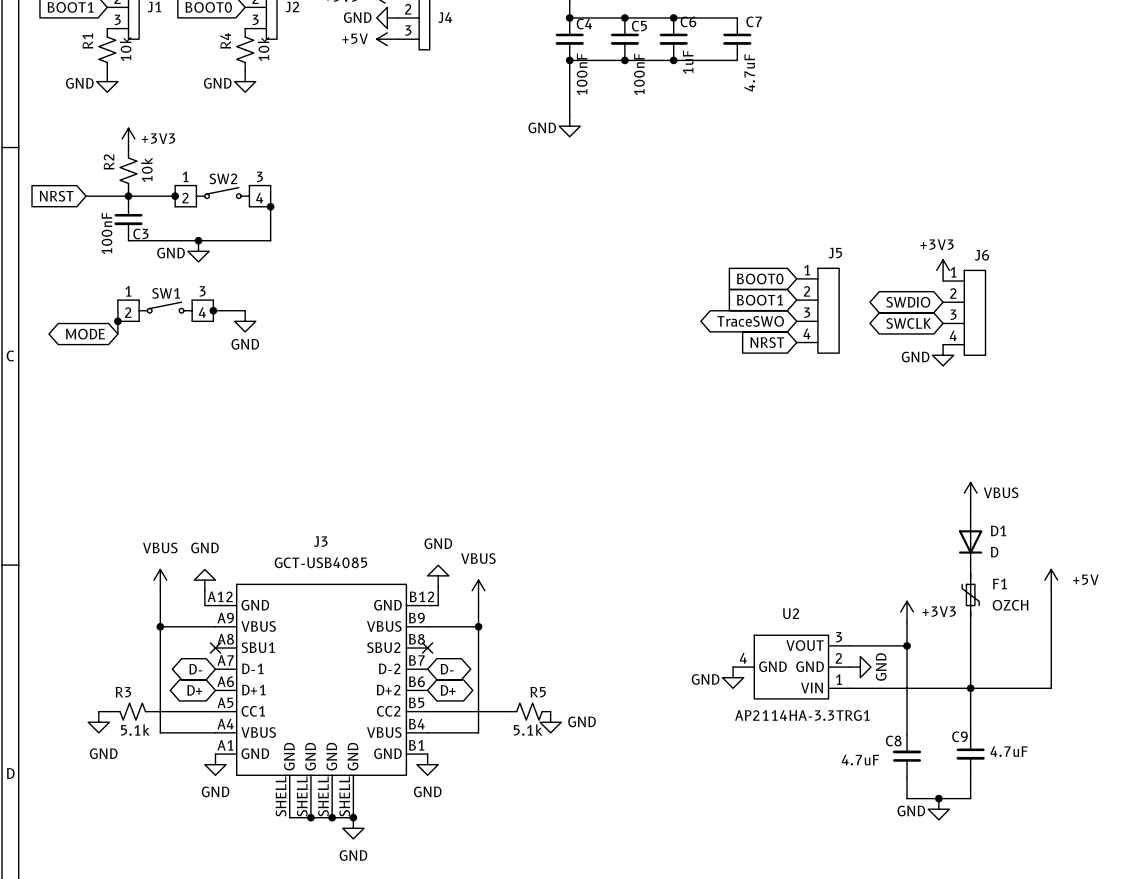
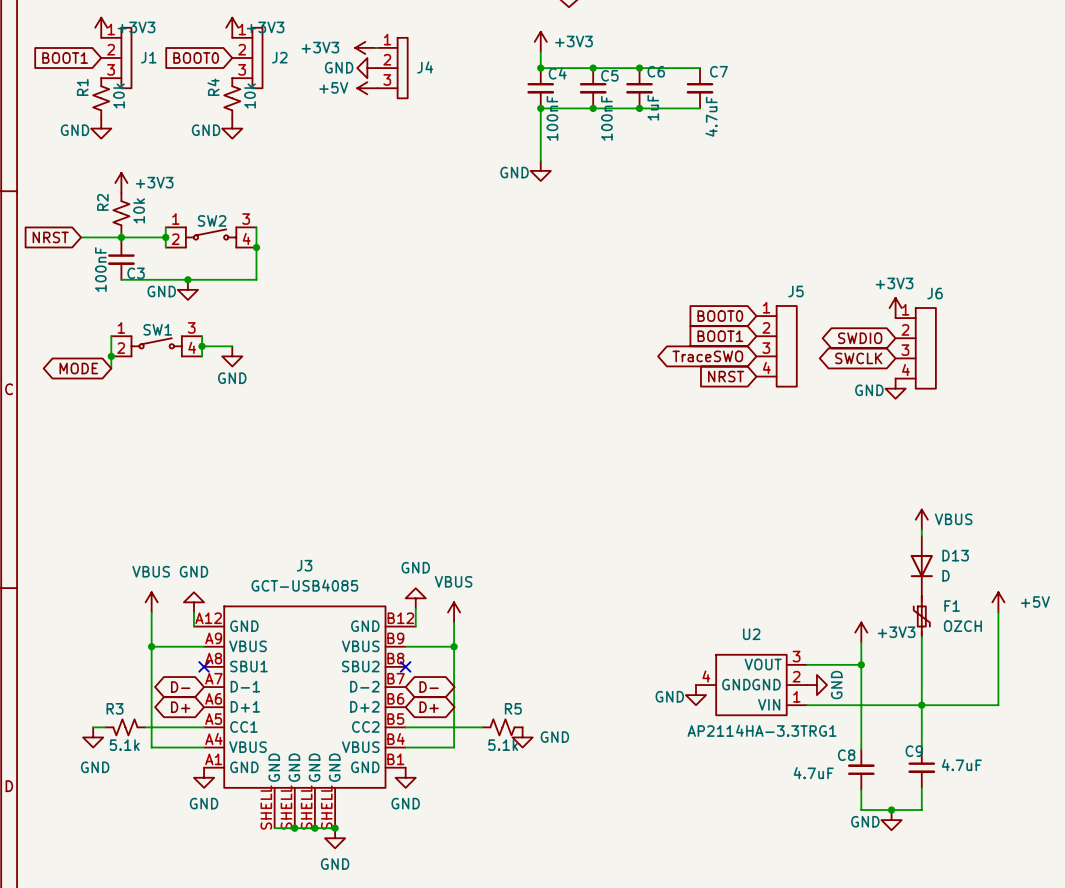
D1 name: D1 (998, 530) -> D13 (955, 555)

